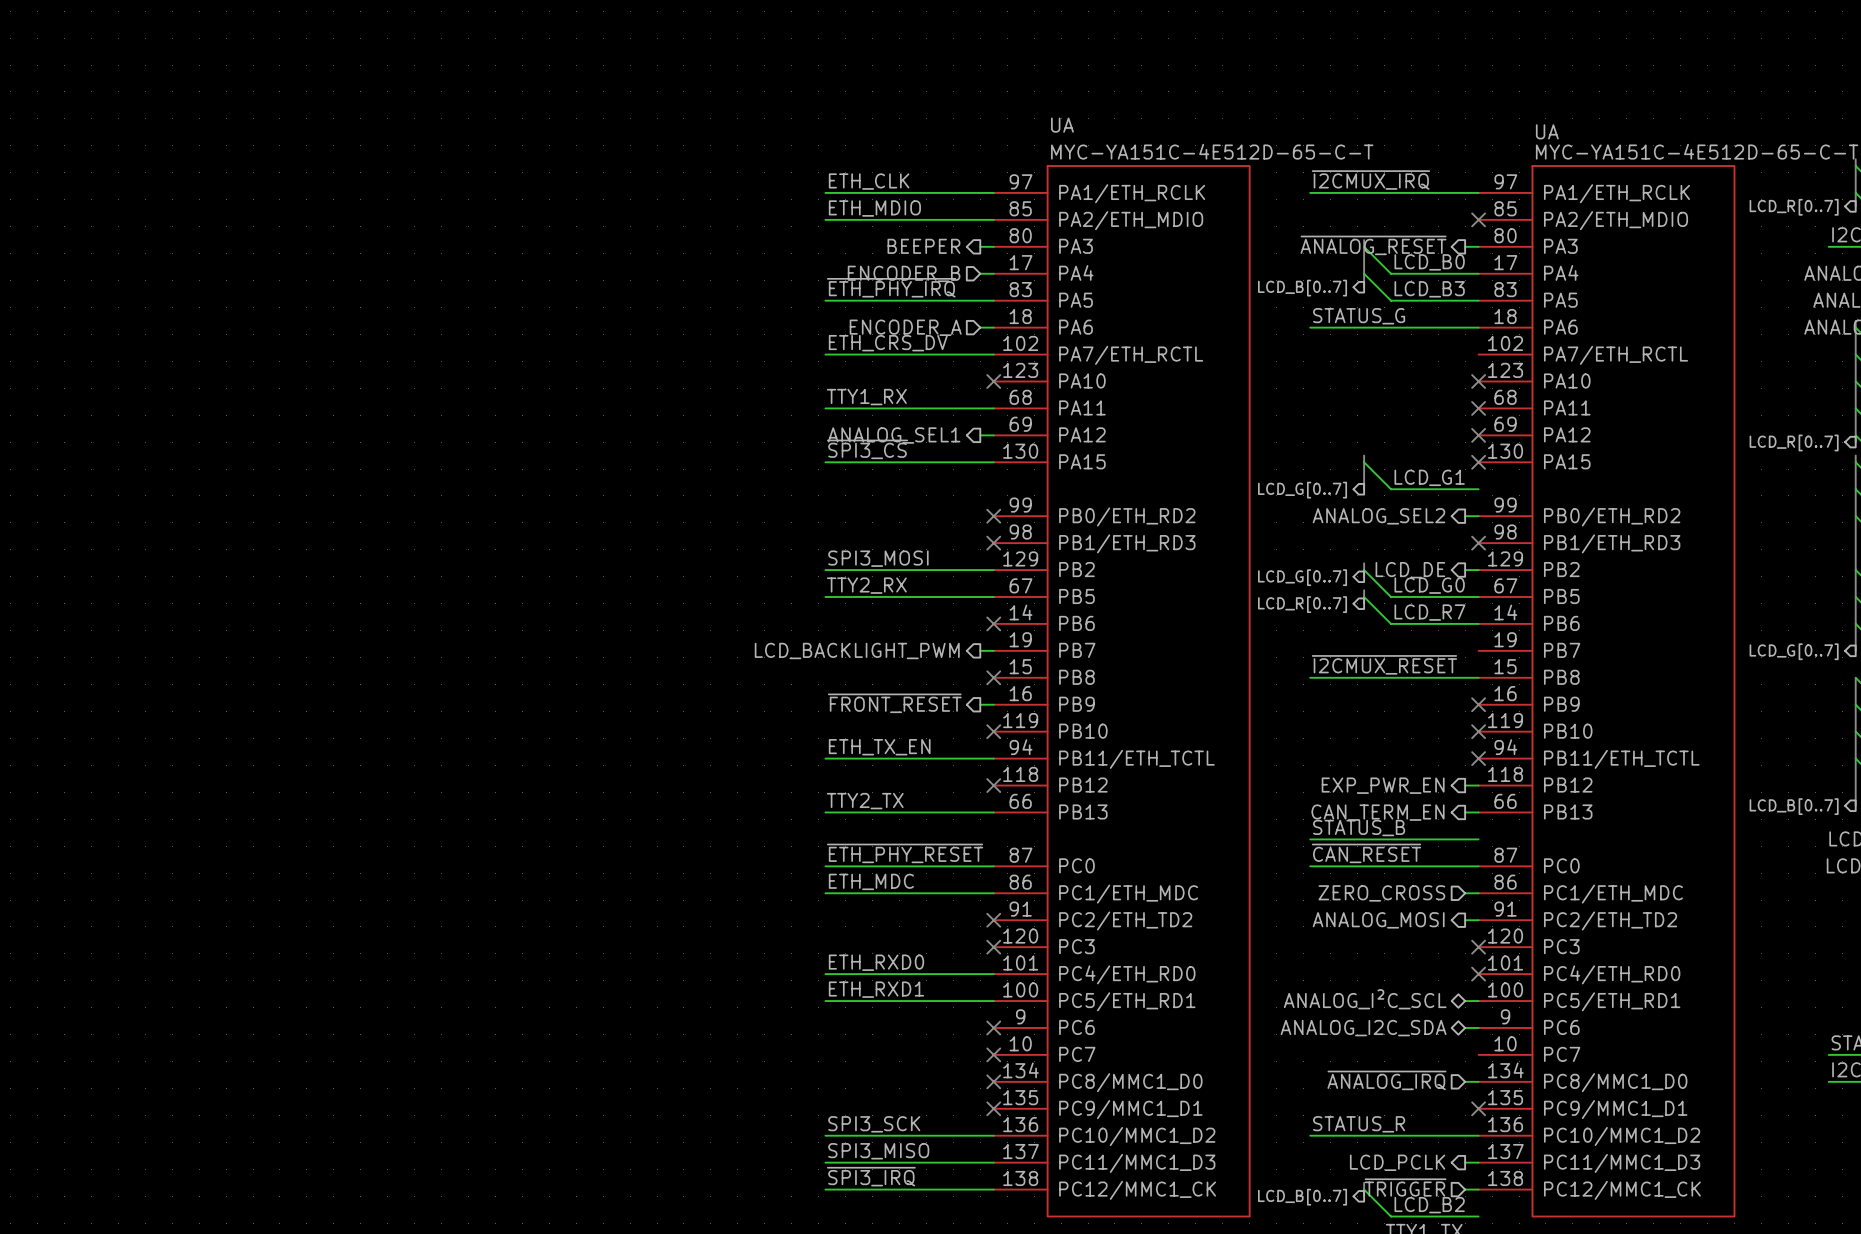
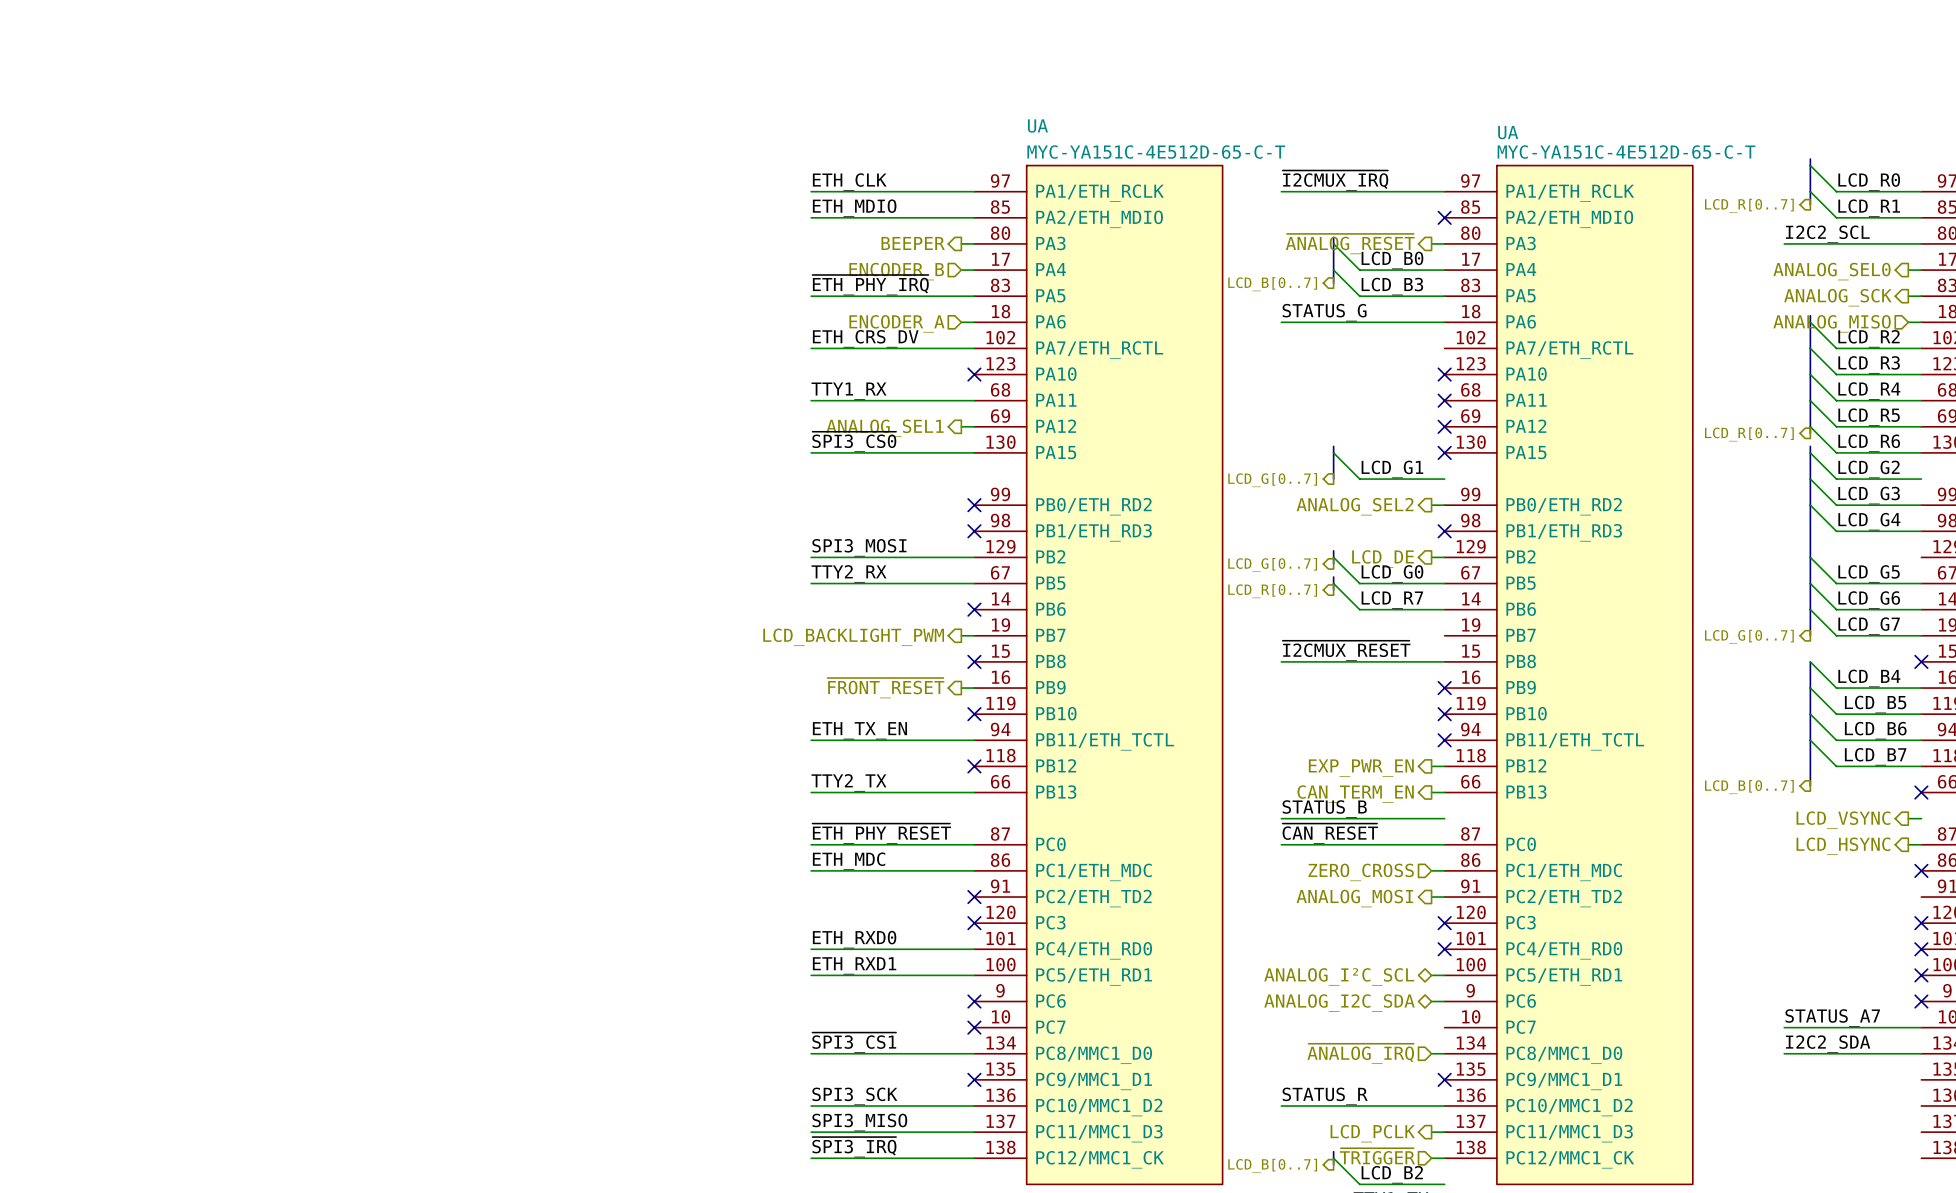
label: ~{SPI3_CS} (867, 449) -> ~{SPI3_CS0} (854, 441)
label: none -> ~{SPI3_CS1} (854, 1042)
wire: none -> (811, 1053) (974, 1053)
no-connect mark: (993, 1081) -> none

